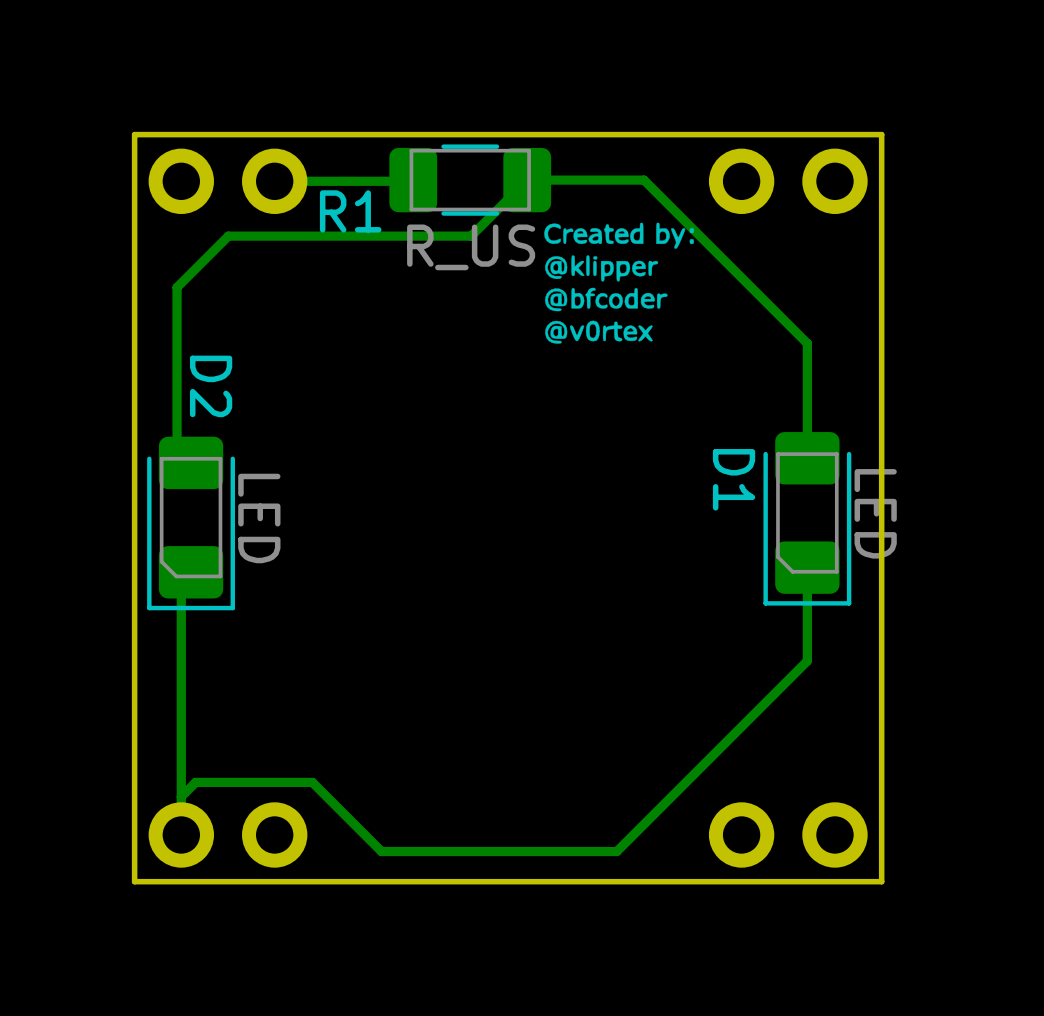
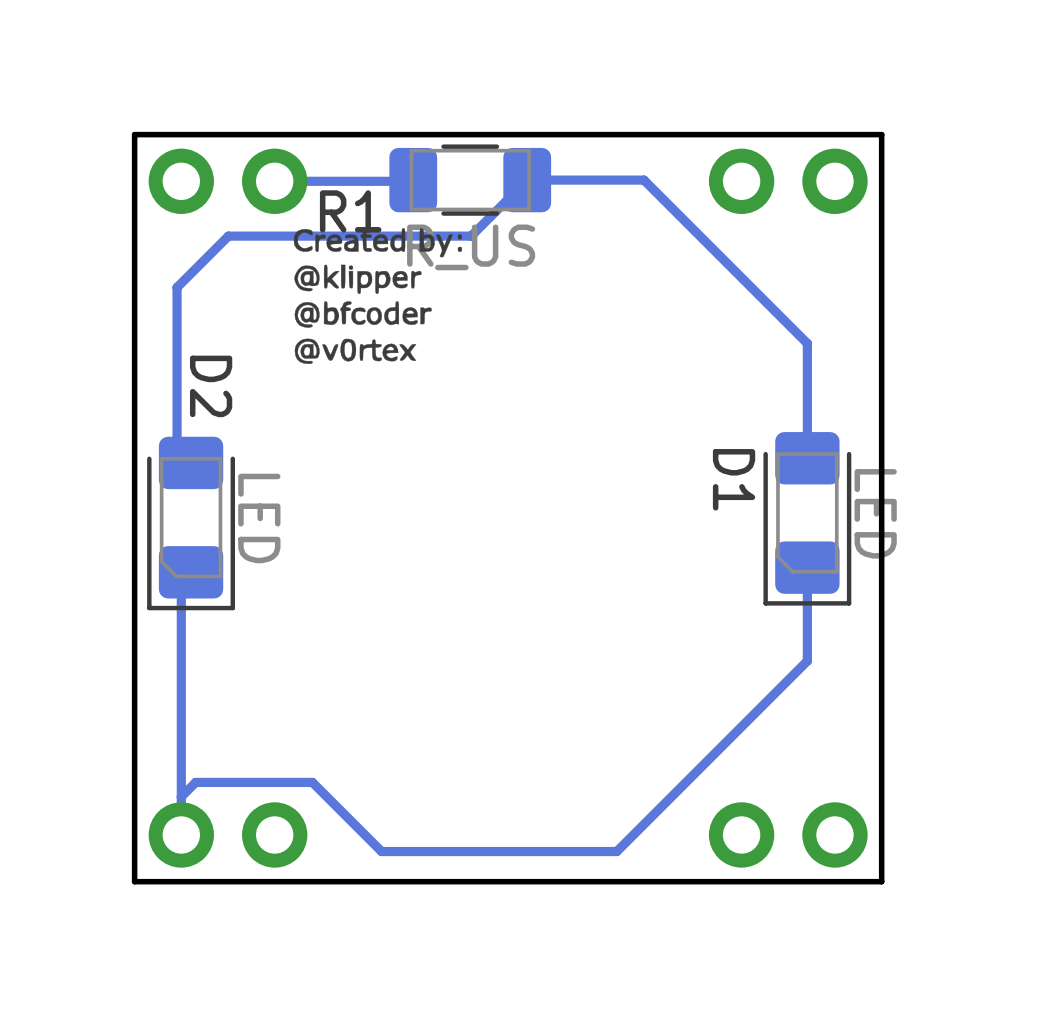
drawing: [544, 222, 694, 344] -> none
drawing: none -> [293, 228, 463, 364]

